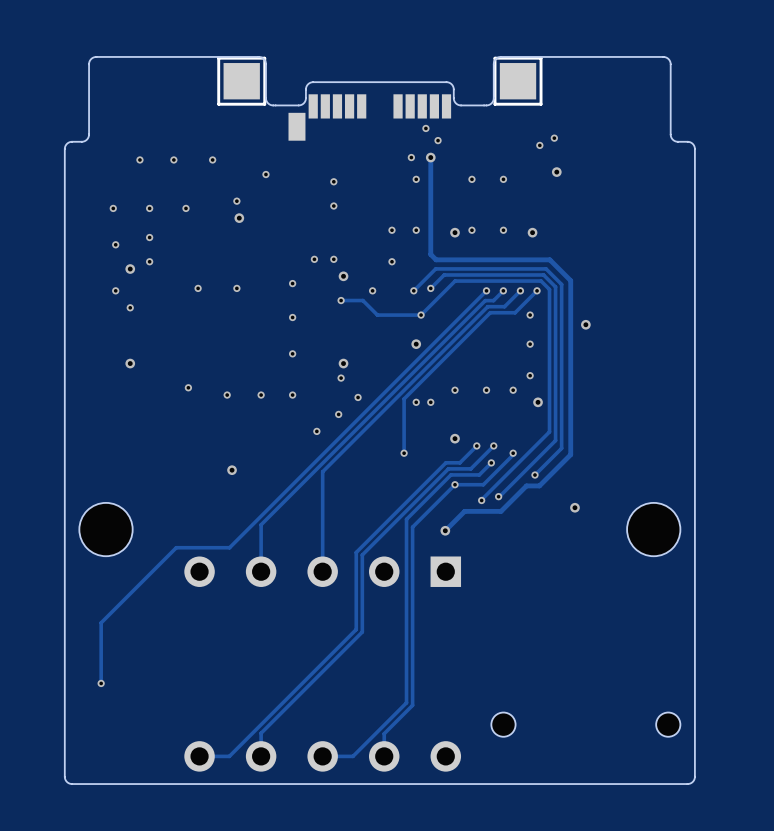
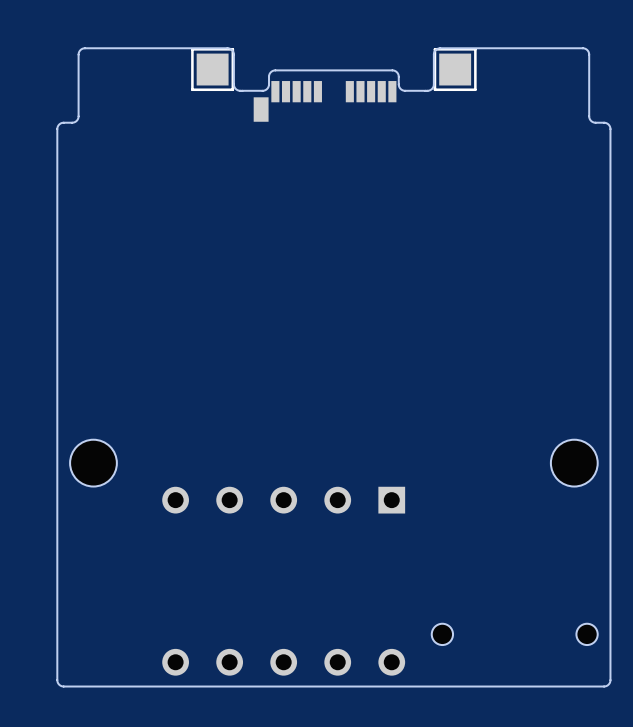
via: (425, 128) -> none
via: (554, 138) -> none
via: (438, 140) -> none
via: (539, 145) -> none
via: (411, 157) -> none
track: (430, 157) (430, 254) (436, 259) (549, 259) (570, 280) (570, 454) (539, 485) (526, 485) (501, 511) (464, 511) (445, 530) -> none
via: (430, 157) -> none
via: (139, 159) -> none
via: (173, 159) -> none
via: (212, 159) -> none
via: (556, 172) -> none
via: (265, 174) -> none
via: (416, 179) -> none
via: (471, 179) -> none
via: (503, 179) -> none
via: (333, 181) -> none
via: (236, 201) -> none
via: (333, 206) -> none
via: (113, 208) -> none
via: (149, 208) -> none
via: (185, 208) -> none
via: (239, 218) -> none
via: (391, 230) -> none
via: (416, 230) -> none
via: (471, 230) -> none
via: (503, 230) -> none
via: (455, 232) -> none
via: (532, 232) -> none
via: (149, 237) -> none
via: (115, 244) -> none
via: (314, 259) -> none
via: (333, 259) -> none
via: (149, 261) -> none
via: (391, 261) -> none
via: (130, 269) -> none
via: (343, 276) -> none
via: (292, 283) -> none
via: (198, 288) -> none
via: (236, 288) -> none
track: (430, 288) (444, 274) (543, 274) (555, 286) (555, 440) (498, 496) -> none
via: (430, 288) -> none
via: (115, 290) -> none
via: (372, 290) -> none
track: (413, 290) (435, 268) (546, 268) (561, 284) (561, 448) (534, 475) -> none
via: (413, 290) -> none
track: (486, 290) (229, 547) (176, 547) (101, 622) (101, 683) -> none
via: (486, 290) -> none
track: (503, 290) (493, 300) (485, 300) (261, 524) (261, 571) -> none
via: (503, 290) -> none
track: (520, 290) (504, 306) (487, 306) (322, 471) (322, 571) -> none
via: (520, 290) -> none
track: (537, 290) (515, 312) (490, 312) (404, 398) (404, 453) -> none
via: (537, 290) -> none
track: (341, 300) (362, 300) (377, 315) (421, 315) (455, 281) (541, 281) (549, 289) (549, 431) (481, 500) -> none
via: (341, 300) -> none
via: (130, 307) -> none
via: (421, 315) -> none
via: (530, 315) -> none
via: (292, 317) -> none
via: (585, 324) -> none
via: (416, 344) -> none
via: (530, 344) -> none
via: (292, 353) -> none
via: (130, 363) -> none
via: (343, 363) -> none
via: (530, 375) -> none
via: (341, 378) -> none
via: (188, 387) -> none
via: (455, 390) -> none
via: (486, 390) -> none
via: (513, 390) -> none
via: (227, 395) -> none
via: (261, 395) -> none
via: (292, 395) -> none
via: (358, 397) -> none
via: (416, 402) -> none
via: (430, 402) -> none
via: (538, 402) -> none
via: (338, 414) -> none
via: (316, 431) -> none
via: (455, 438) -> none
track: (476, 445) (459, 462) (445, 462) (356, 552) (356, 629) (229, 756) (199, 756) -> none
via: (476, 445) -> none
track: (493, 445) (470, 468) (448, 468) (362, 554) (362, 632) (261, 733) (261, 756) -> none
via: (493, 445) -> none
via: (404, 453) -> none
track: (513, 453) (483, 484) (455, 484) (412, 527) (412, 705) (384, 733) (384, 756) -> none
via: (513, 453) -> none
track: (491, 462) (479, 474) (450, 474) (406, 519) (406, 702) (352, 756) (322, 756) -> none
via: (491, 462) -> none
via: (232, 470) -> none
via: (534, 475) -> none
via: (455, 484) -> none
via: (498, 496) -> none
via: (481, 500) -> none
via: (574, 507) -> none
via: (445, 530) -> none
via: (101, 683) -> none

